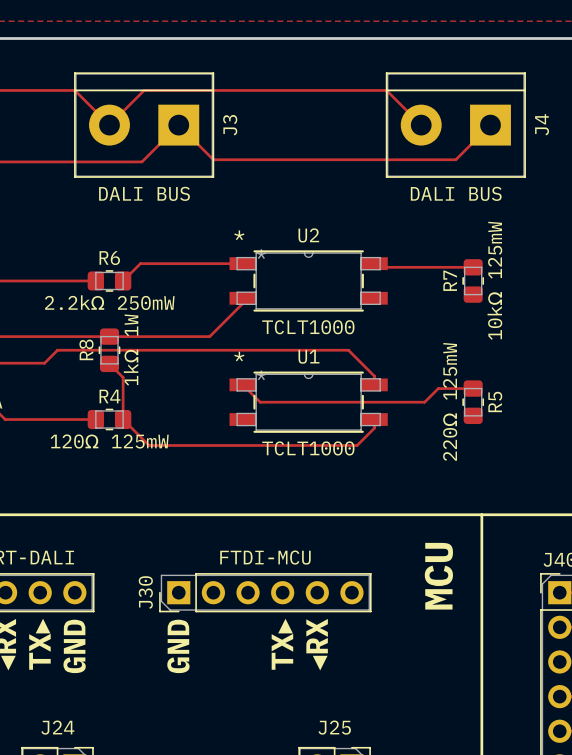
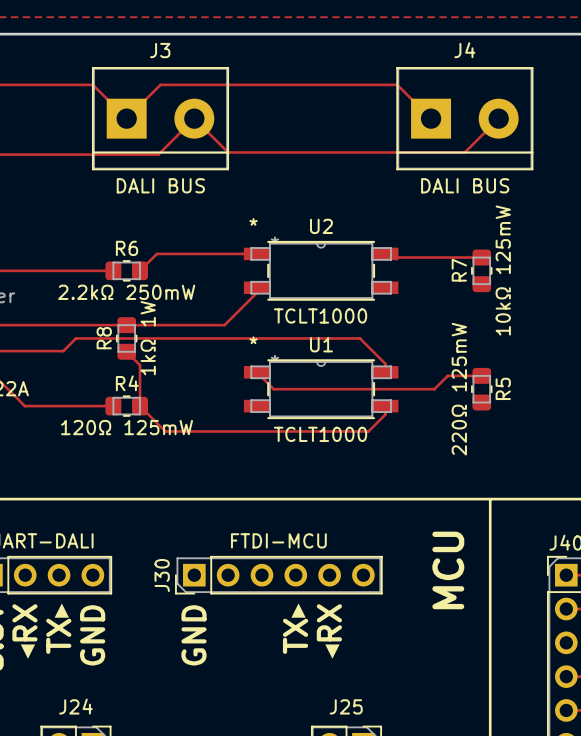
J4 name position: J4 (542, 124) -> J4 (464, 50)
J3 rotation: 0° (144, 125) -> 180° (160, 118)
J3 name position: J3 (230, 125) -> J3 (160, 50)
J4 rotation: 0° (455, 125) -> 180° (464, 118)

